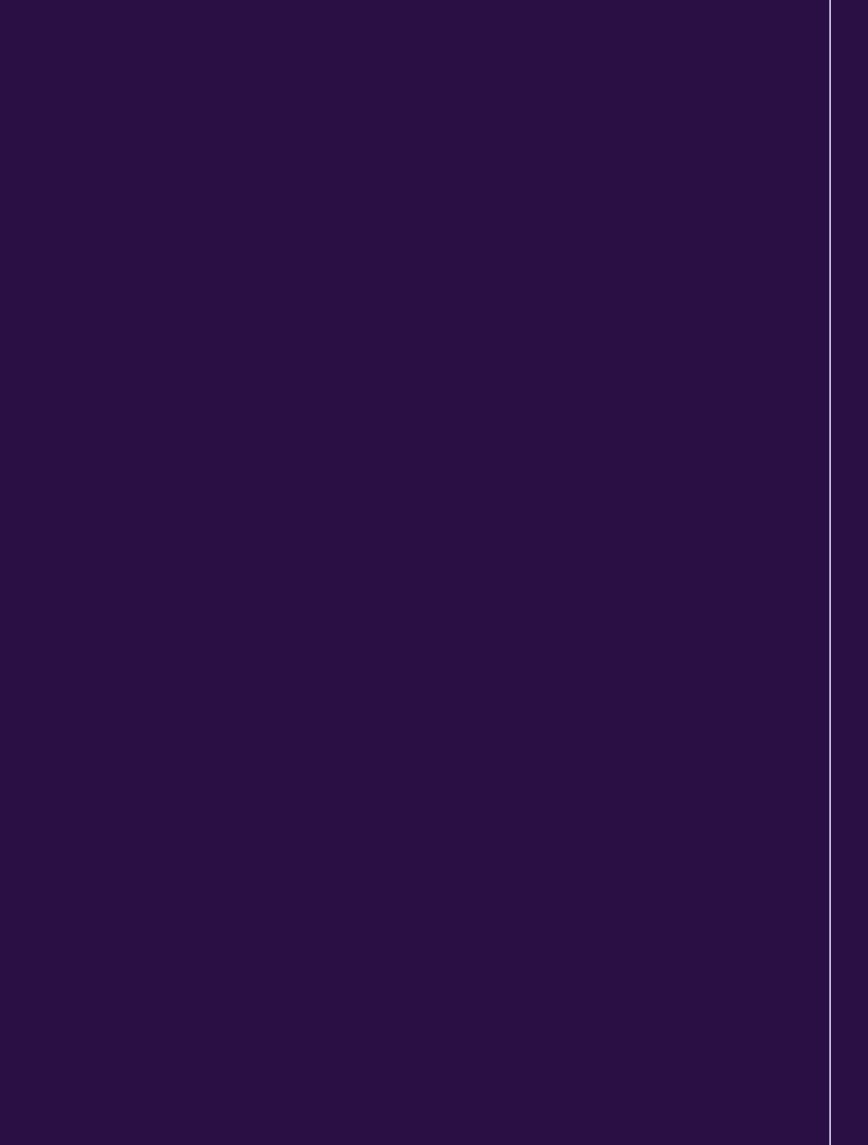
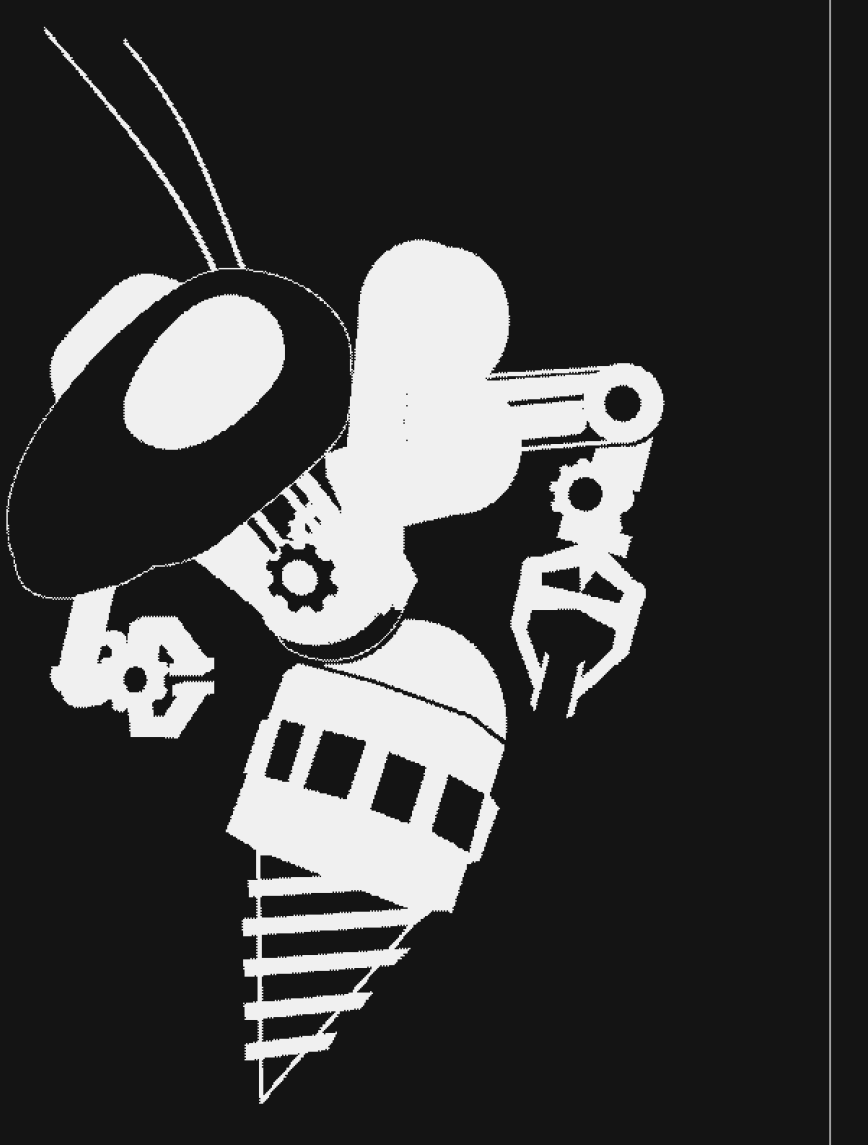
drawing: none -> [6, 26, 665, 1104]

